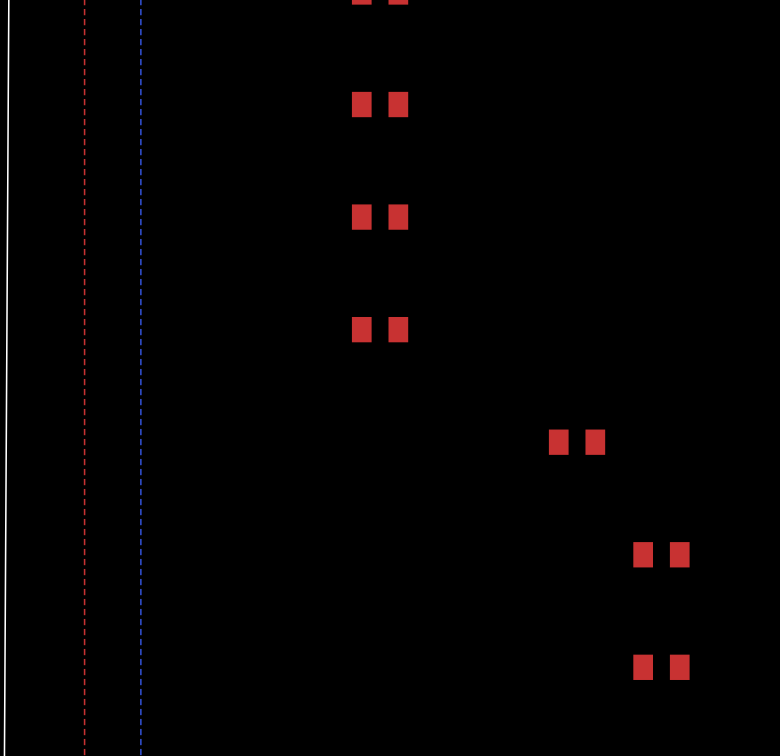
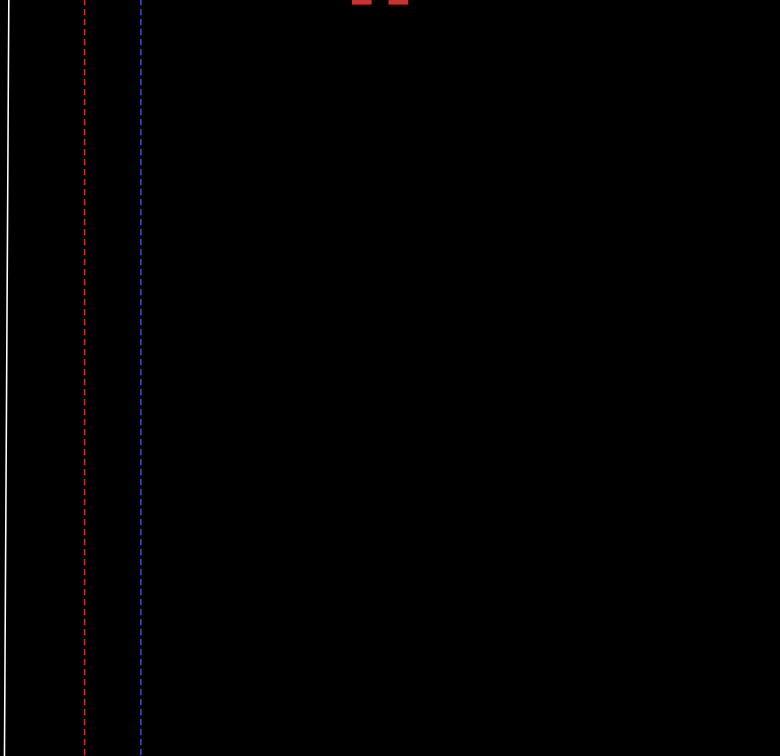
part: (380, 104) -> none
part: (380, 217) -> none
part: (380, 329) -> none
part: (577, 442) -> none
part: (661, 554) -> none
part: (661, 667) -> none

